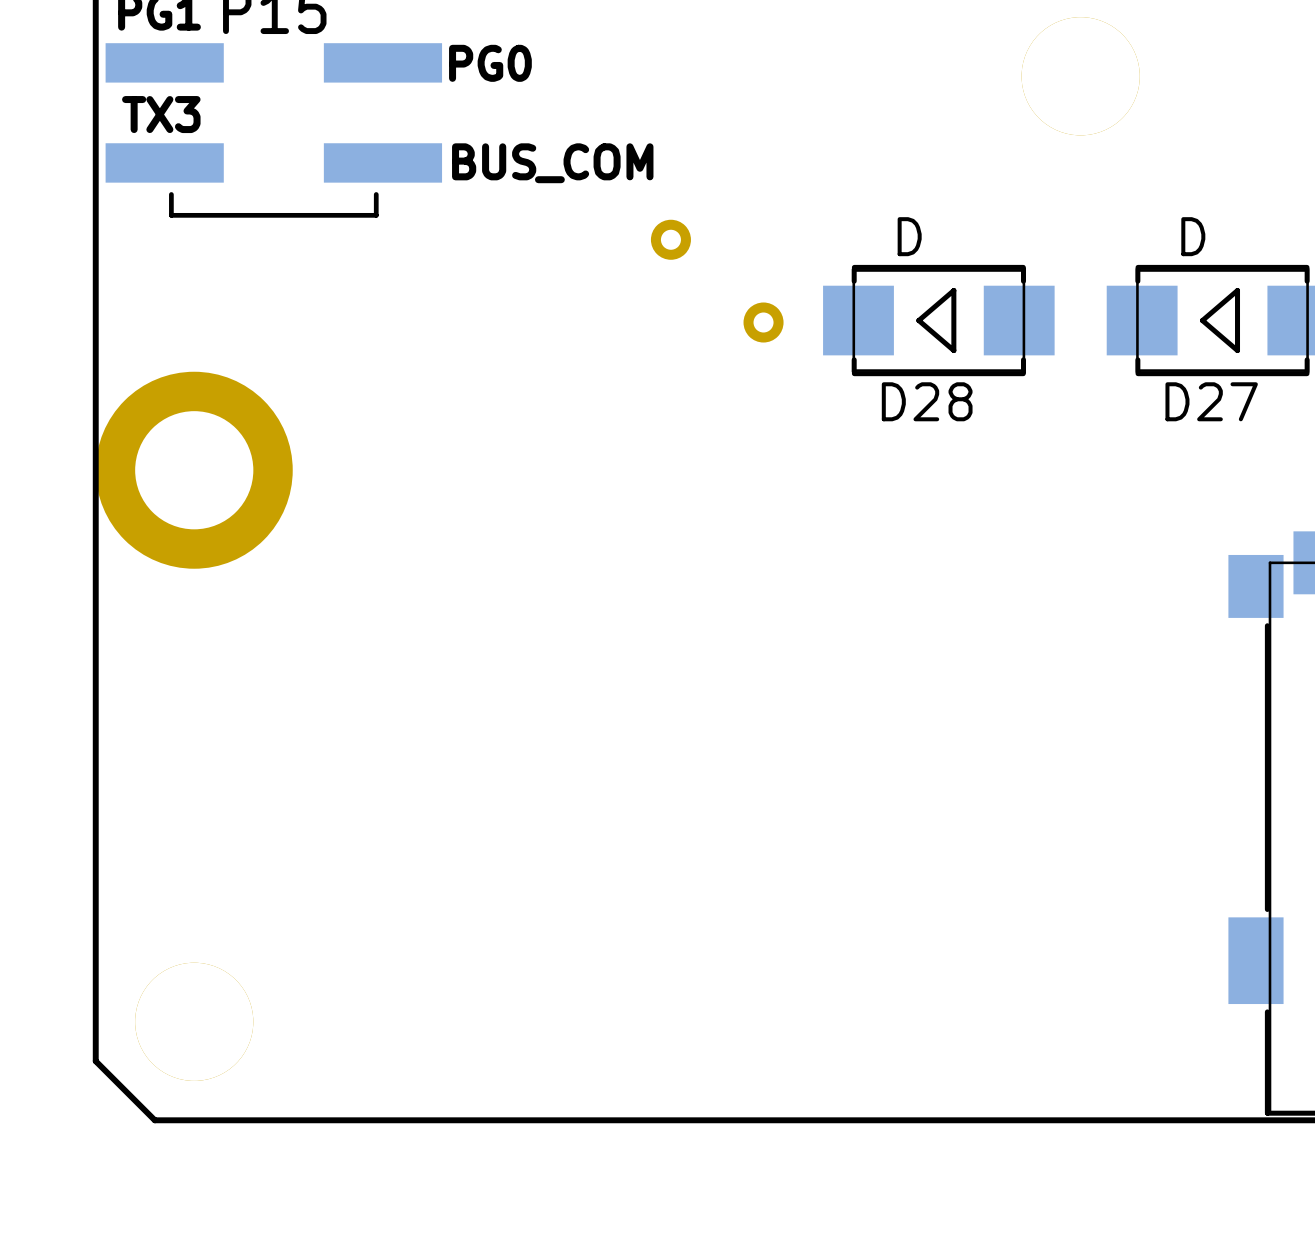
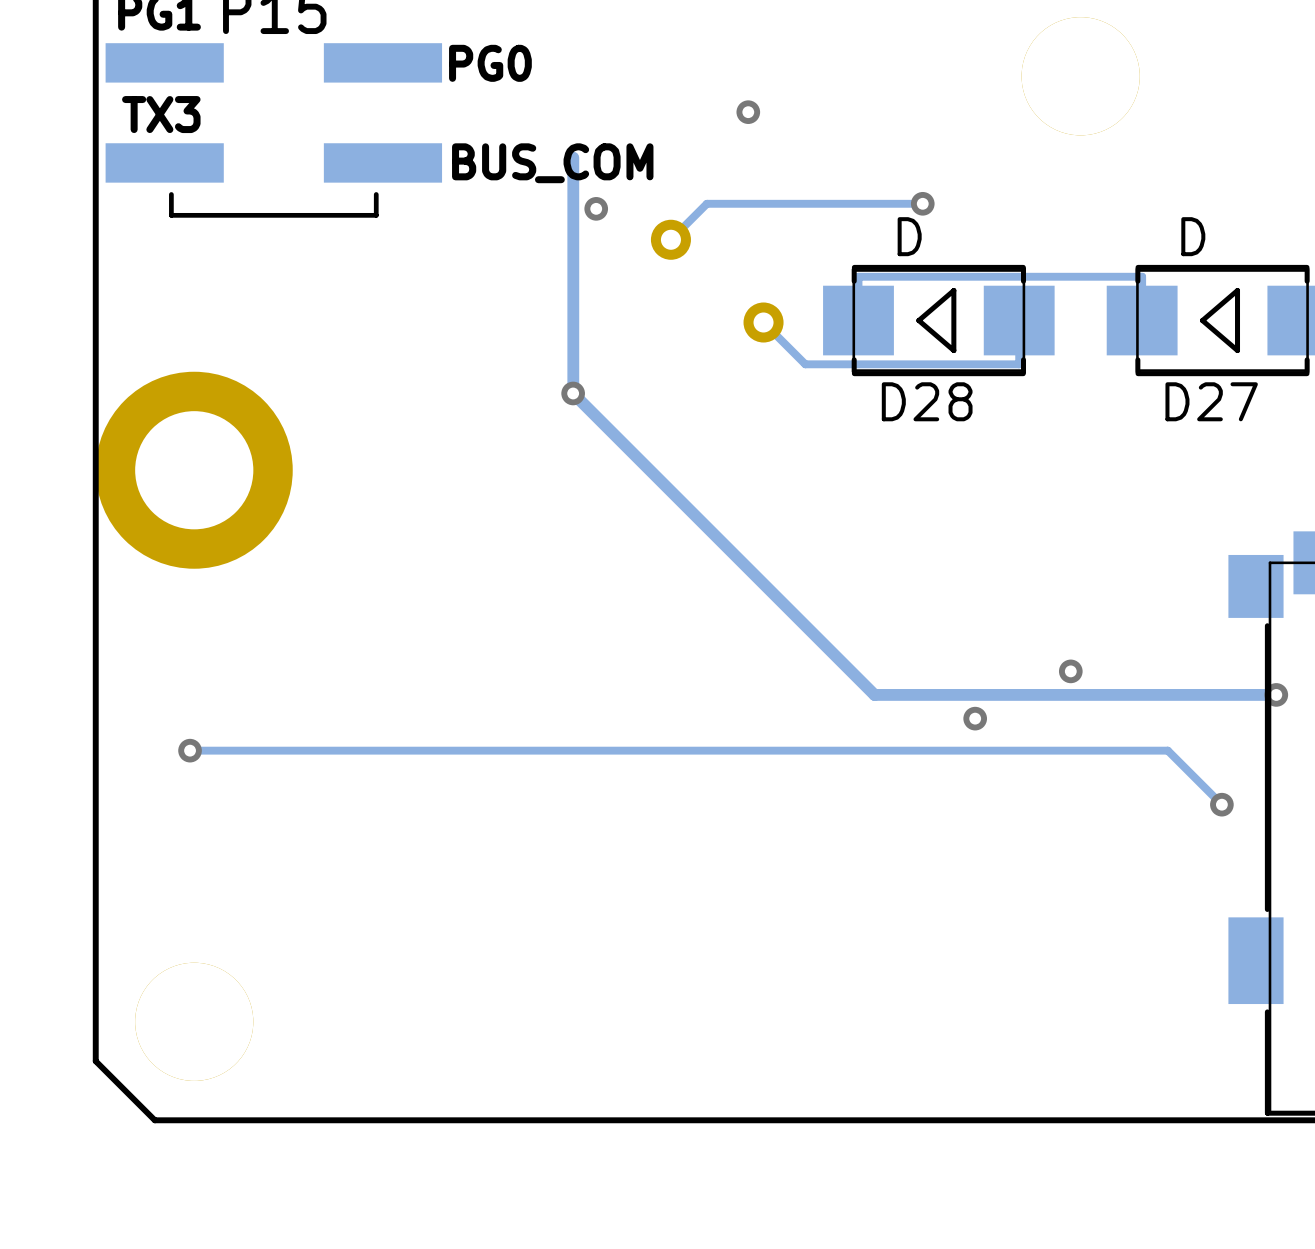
via: none -> (748, 112)
track: none -> (573, 157) (573, 393) (874, 694) (1276, 694)
track: none -> (922, 203) (706, 203) (670, 239)
via: none -> (922, 203)
via: none -> (596, 208)
track: none -> (1019, 320) (1019, 364) (805, 364) (763, 322)
track: none -> (1142, 320) (1142, 276) (858, 276) (858, 320)
via: none -> (573, 393)
via: none -> (1070, 671)
via: none -> (1276, 694)
via: none -> (975, 718)
track: none -> (190, 750) (1167, 750) (1221, 804)
via: none -> (190, 750)
via: none -> (1221, 804)

